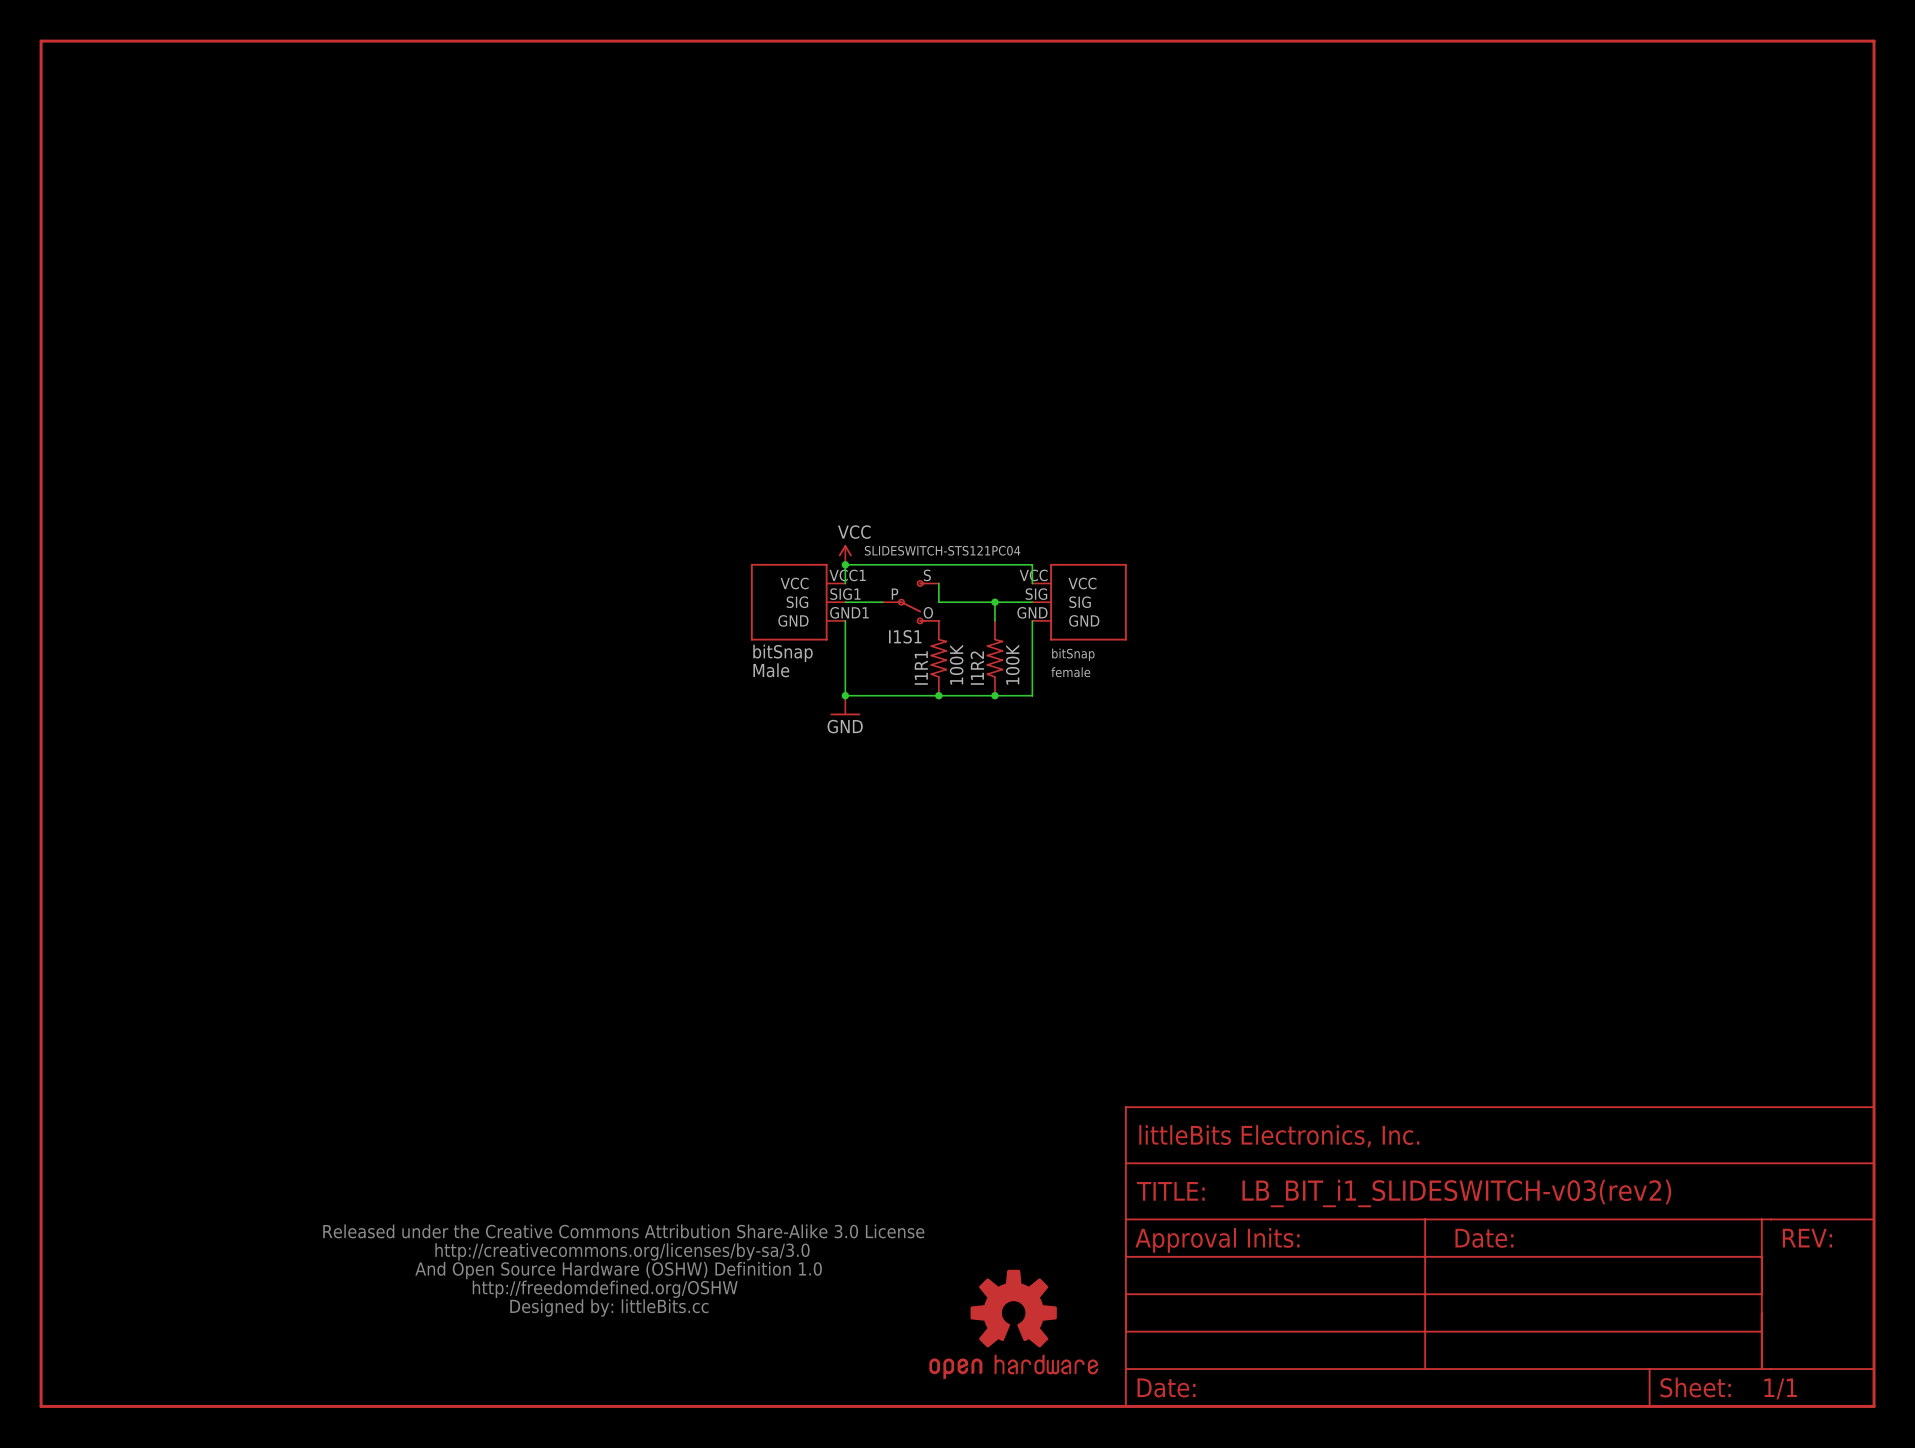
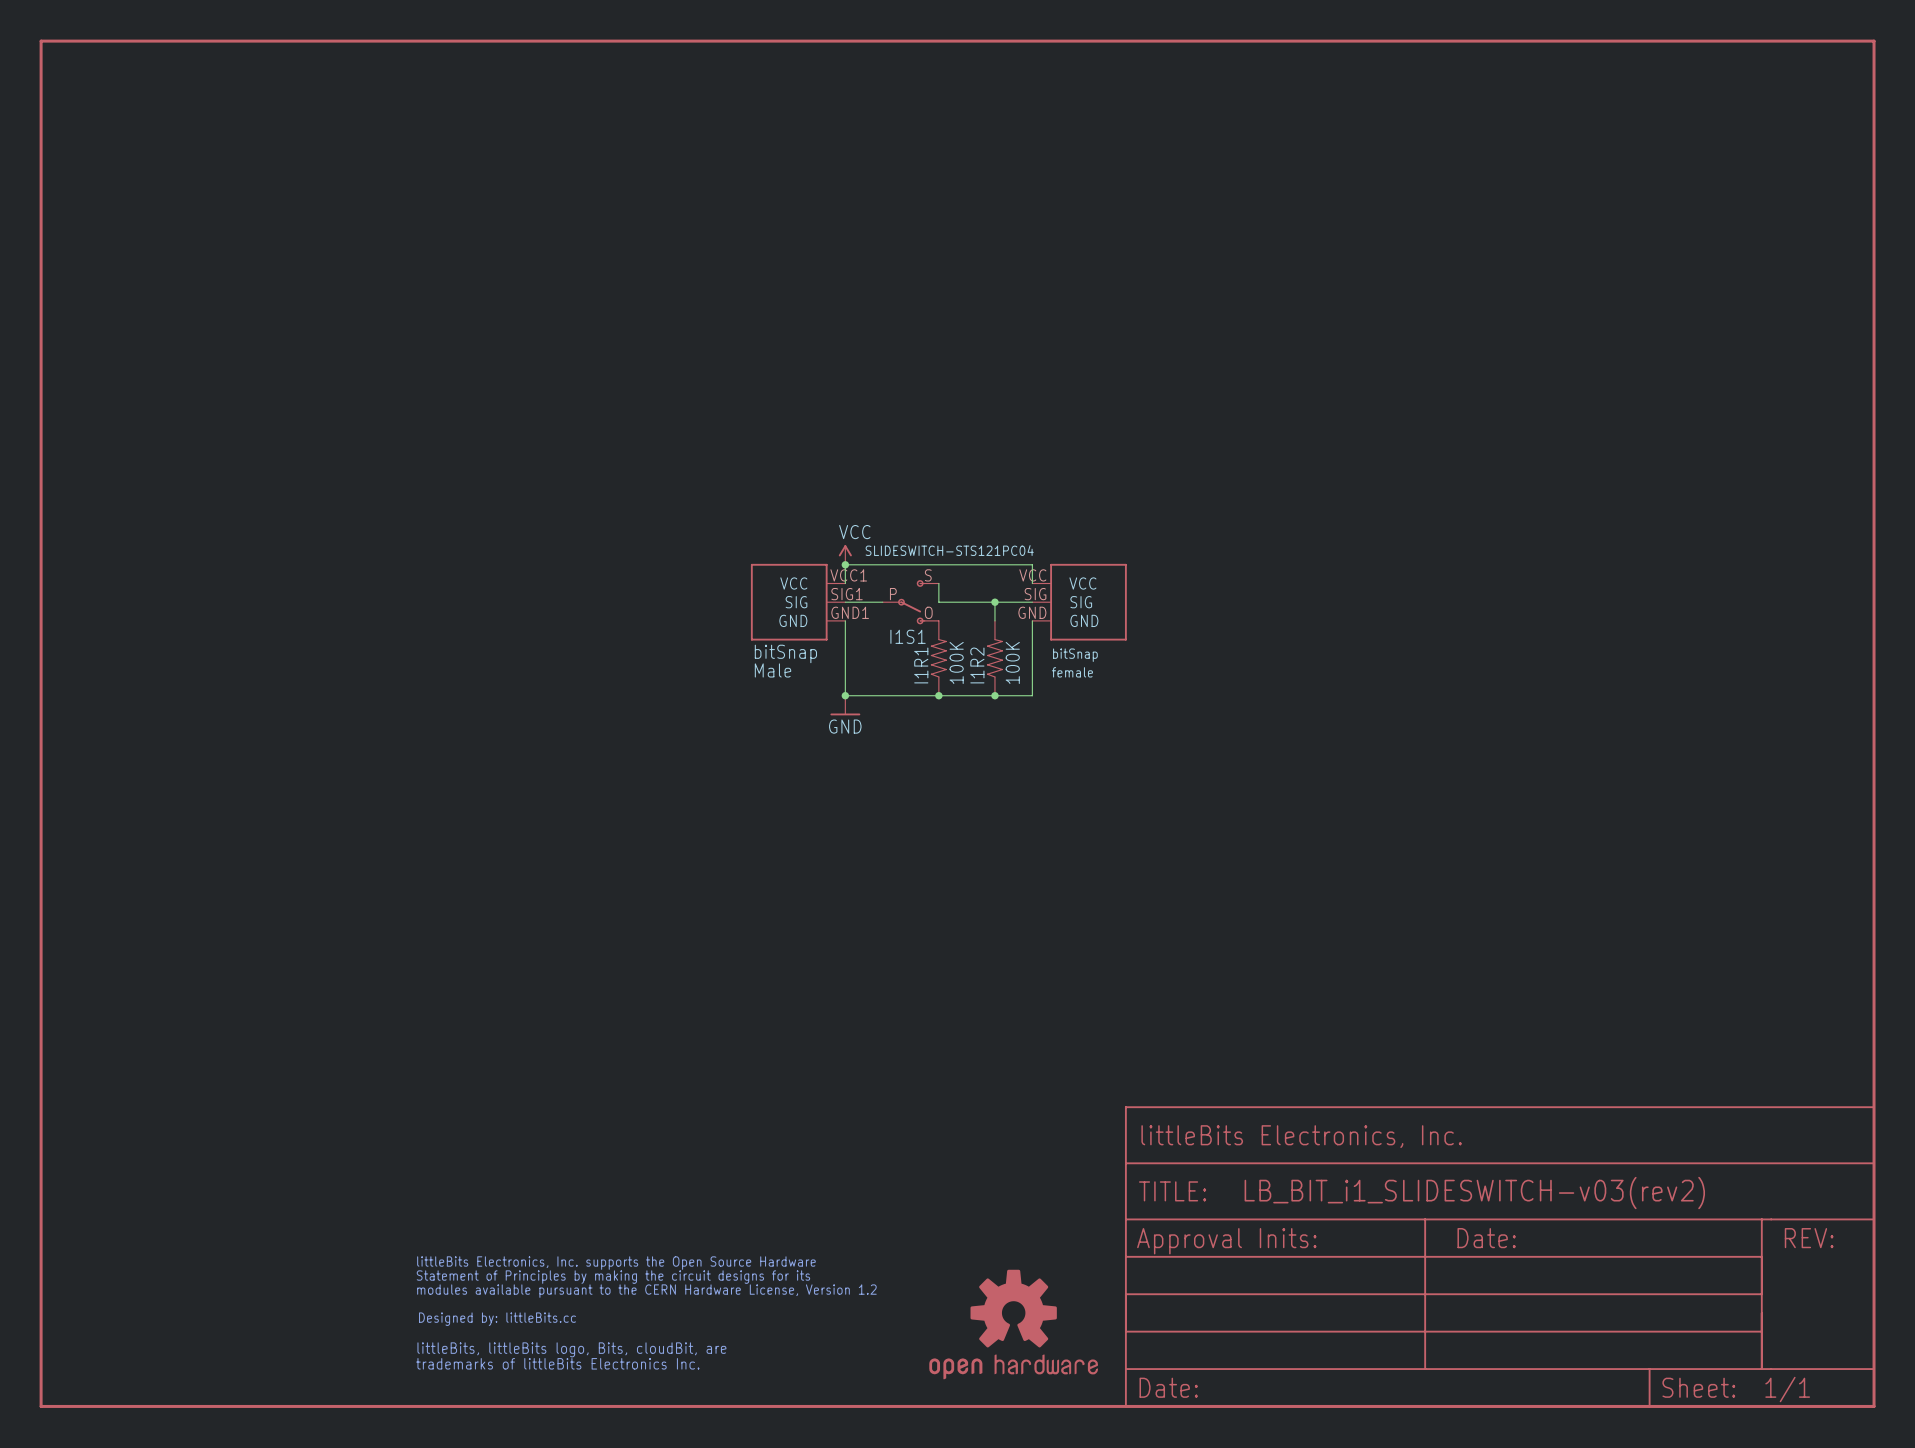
part: (623, 1270) -> none
part: none -> (646, 1312)

